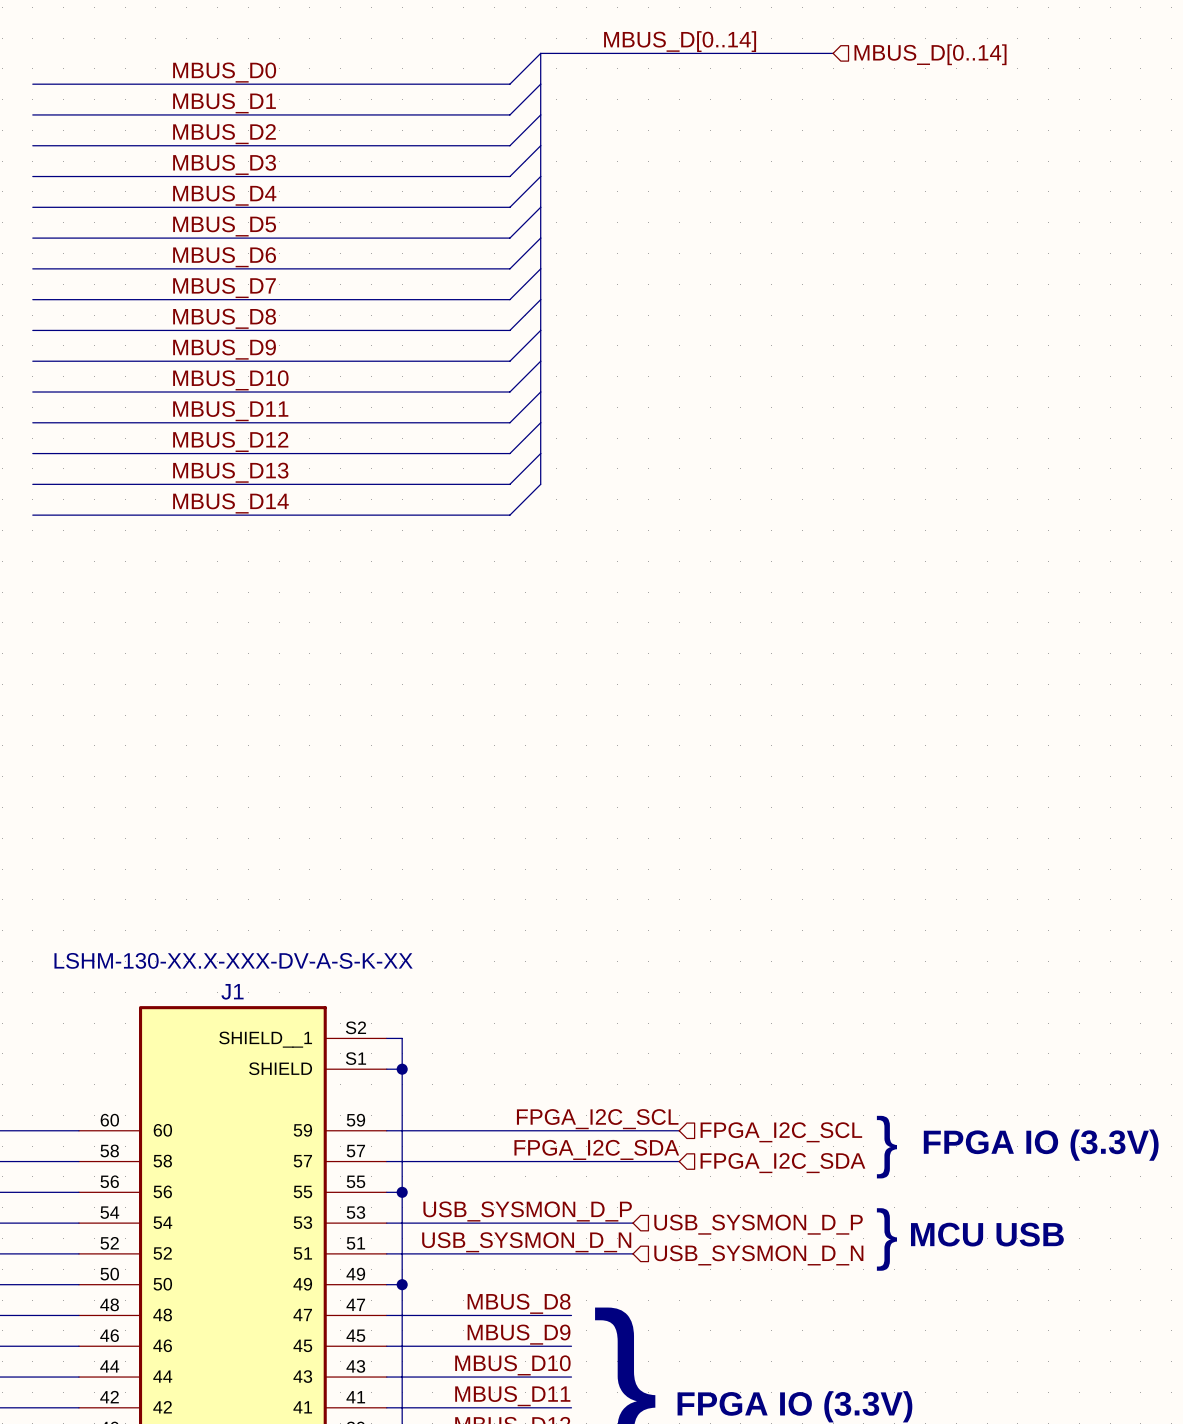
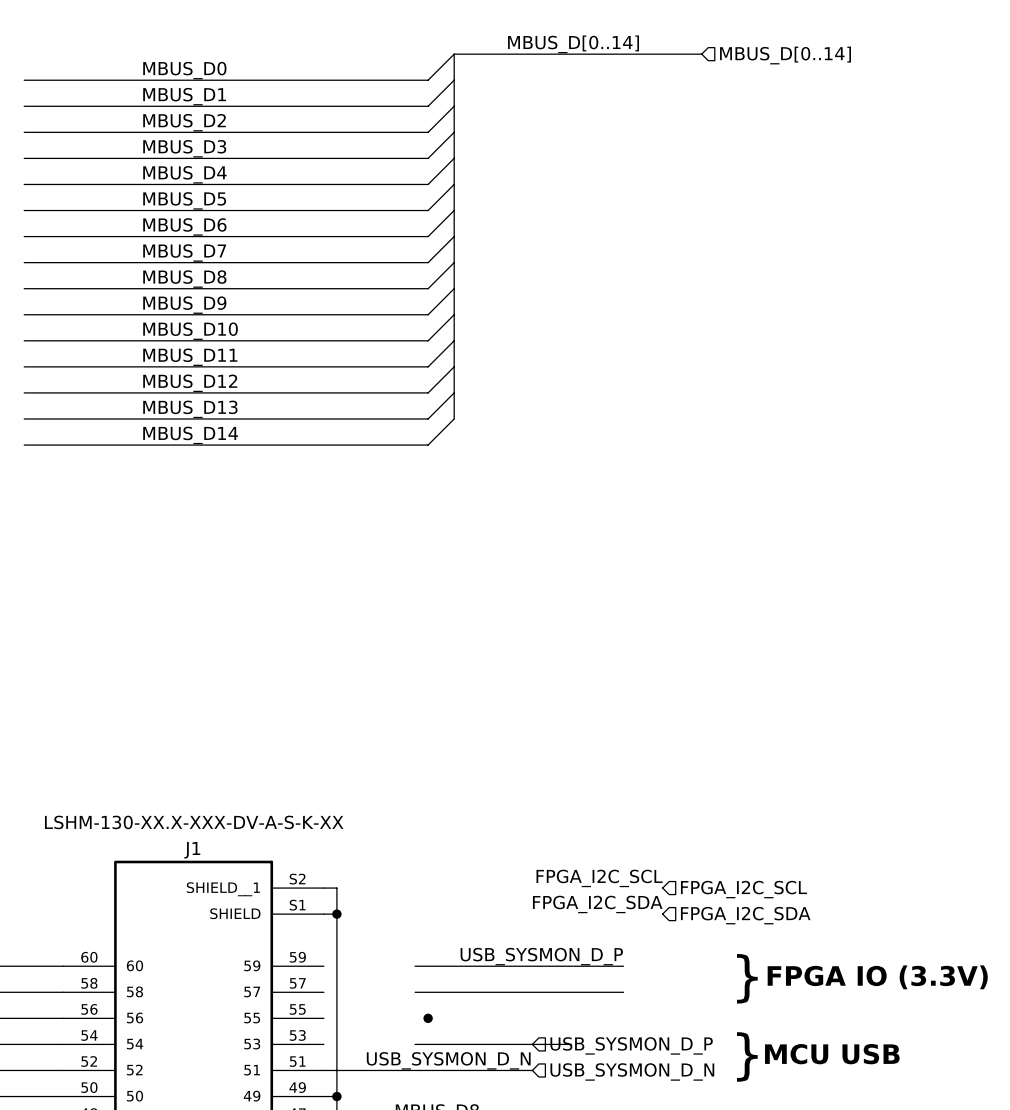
label position: FPGA_I2C_SCL (597, 1119) -> FPGA_I2C_SCL (599, 878)
wire: (386, 1130) (494, 1130) -> none
wire: none -> (571, 966) (623, 966)
hierarchical label position: FPGA_I2C_SCL (781, 1132) -> FPGA_I2C_SCL (743, 889)
label position: FPGA_I2C_SDA (596, 1149) -> FPGA_I2C_SDA (597, 904)
wire: (386, 1161) (494, 1161) -> none
wire: none -> (571, 992) (623, 992)
hierarchical label position: FPGA_I2C_SDA (782, 1163) -> FPGA_I2C_SDA (745, 915)
wire: (386, 1192) (402, 1192) -> none
junction: (402, 1192) -> none
junction: none -> (428, 1018)
label position: USB_SYSMON_D_P (527, 1211) -> USB_SYSMON_D_P (541, 956)
wire: (386, 1223) (494, 1223) -> none
wire: none -> (532, 1044) (571, 1044)

